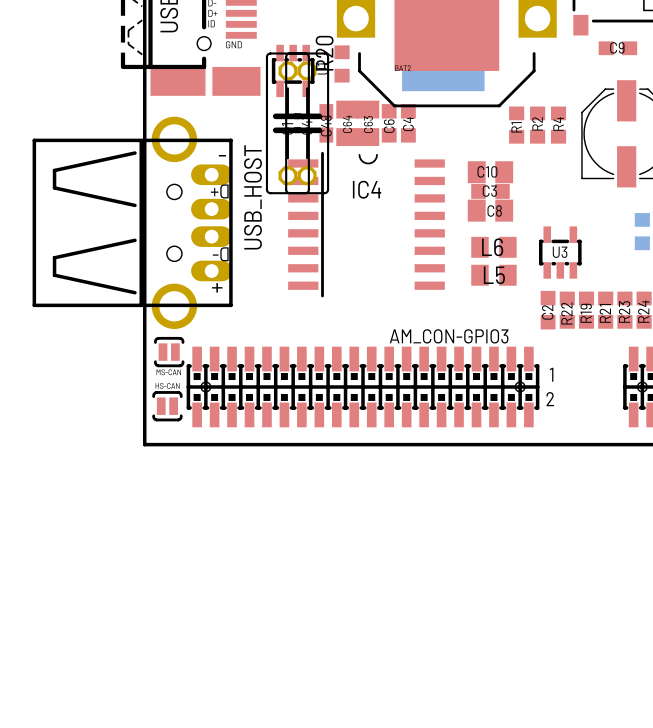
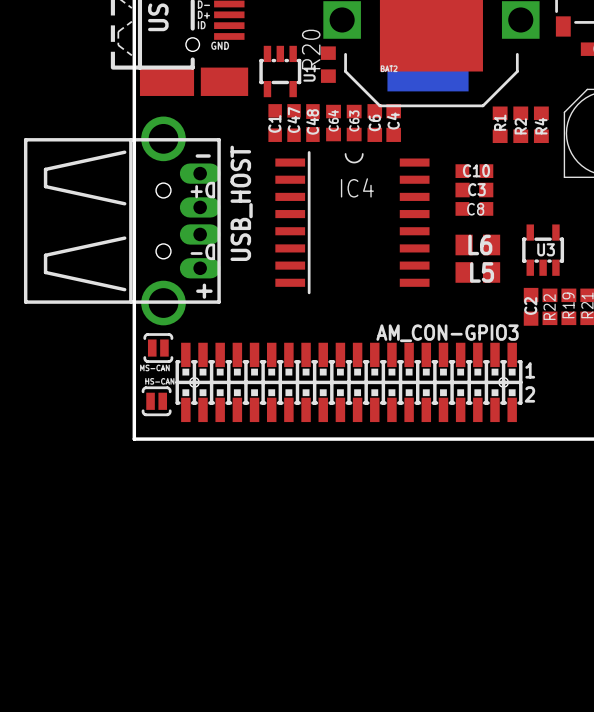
C1 footprint: [265, 52, 310, 195] -> [268, 104, 282, 142]
C47 footprint: [285, 52, 330, 195] -> [287, 104, 301, 142]
C64 footprint: [336, 100, 359, 147] -> [326, 104, 341, 142]
C63 footprint: [357, 100, 380, 147] -> [346, 104, 362, 142]
C10 footprint: [467, 161, 514, 184] -> [455, 164, 494, 179]
C8 footprint: [467, 199, 514, 222] -> [455, 202, 494, 216]

